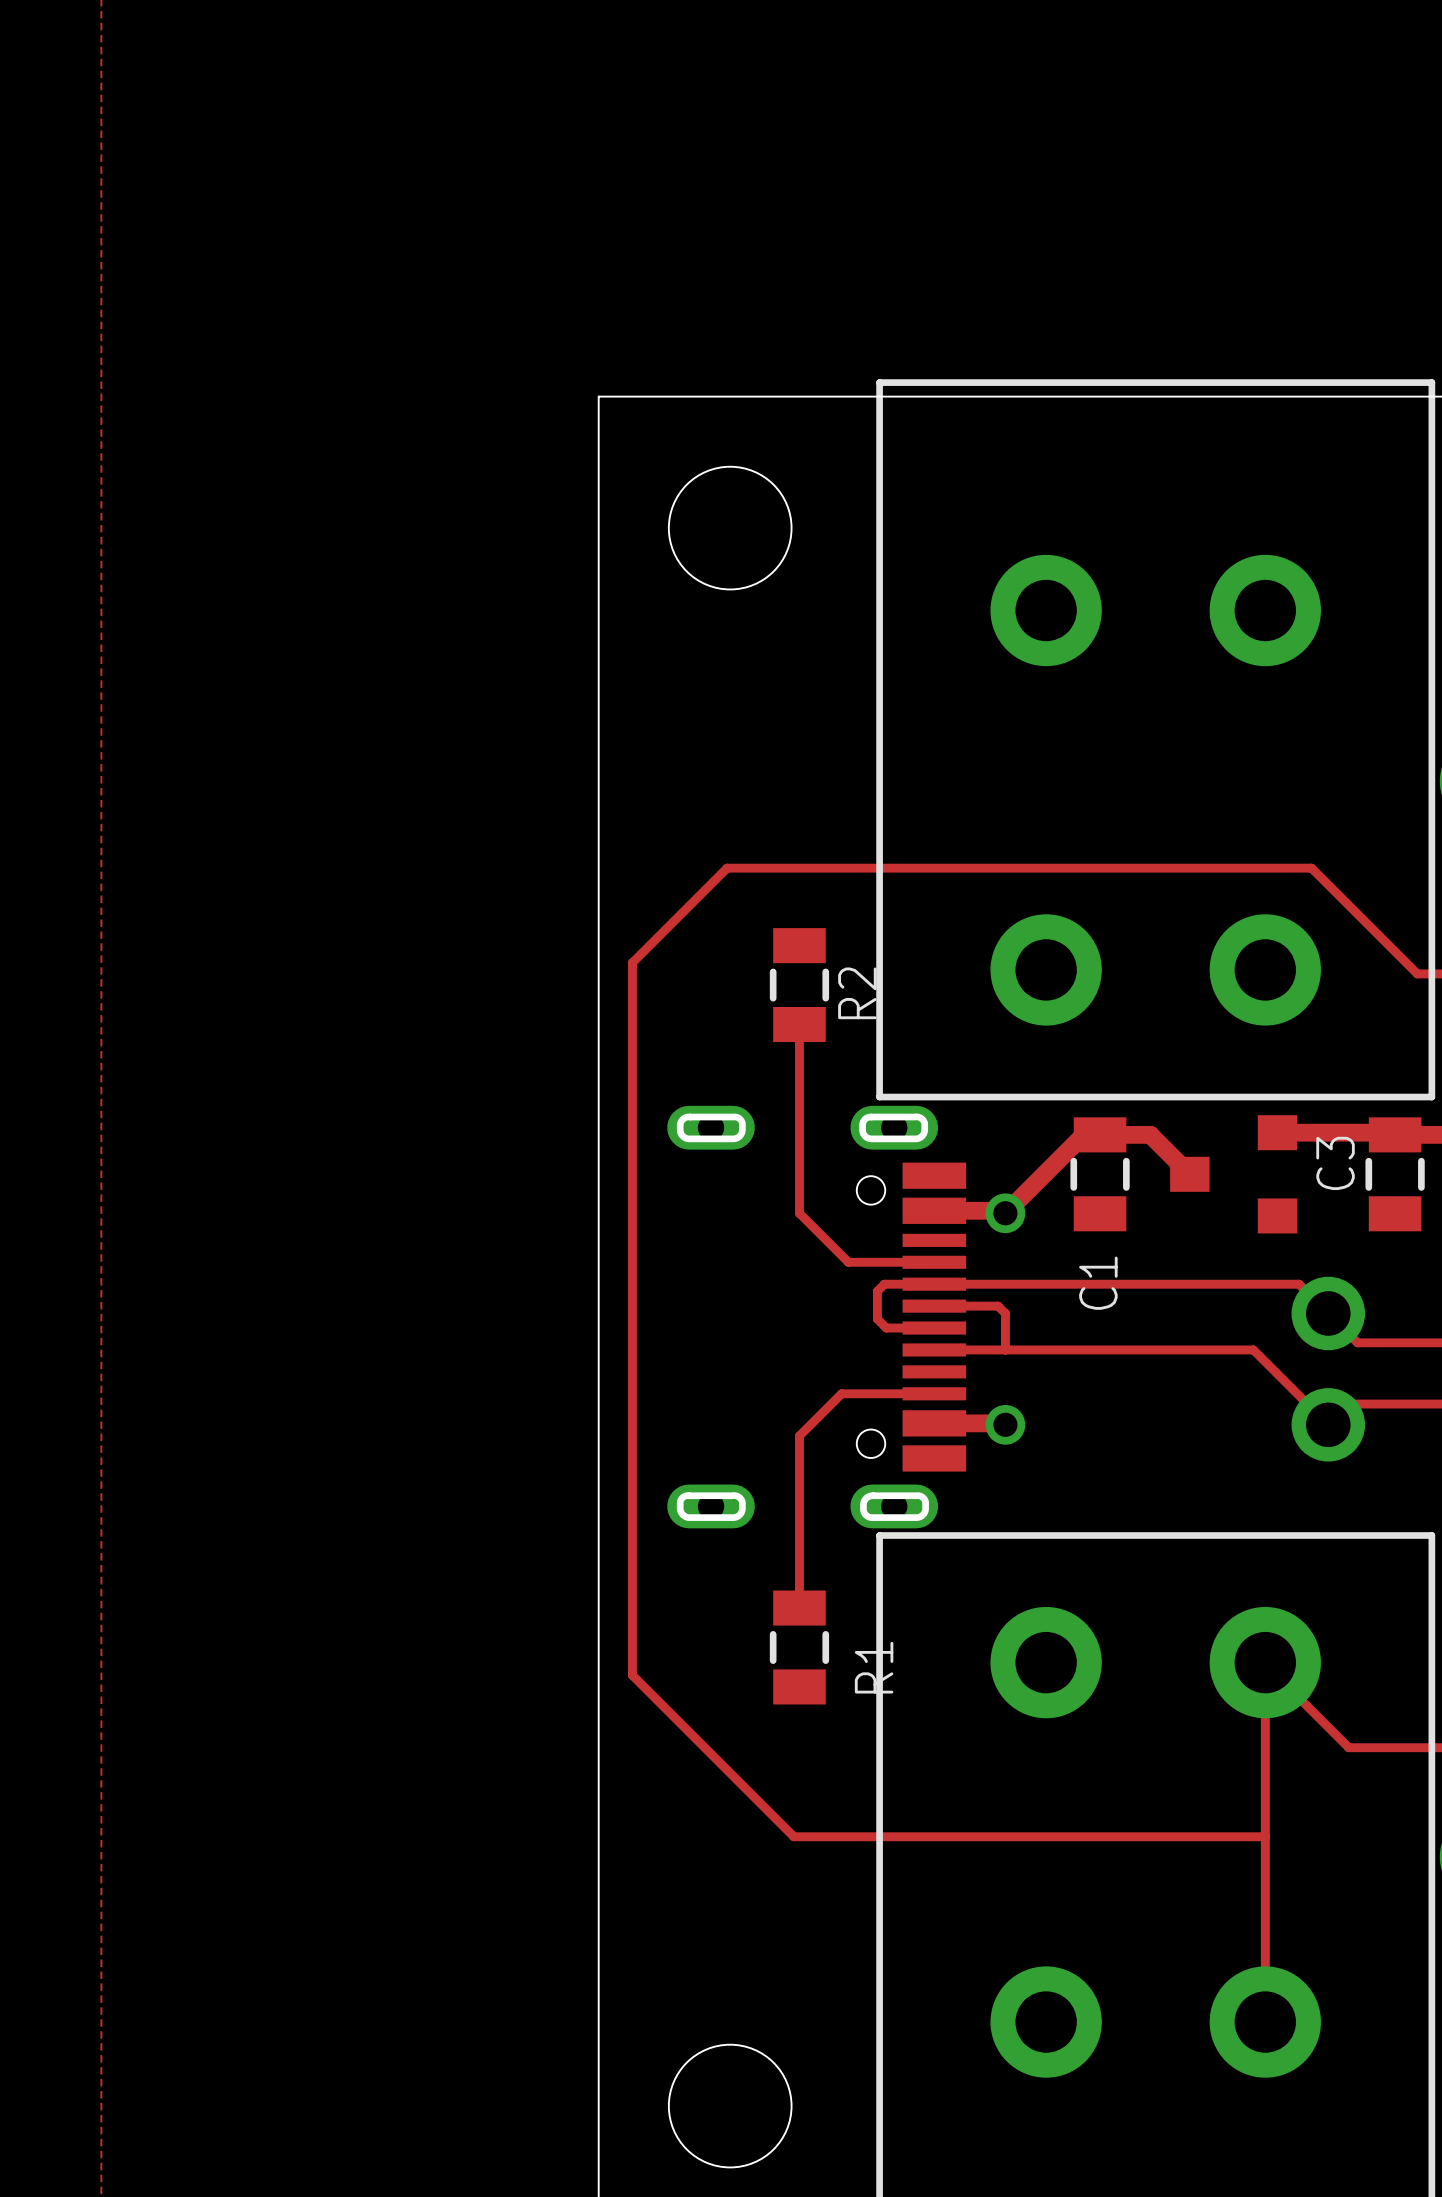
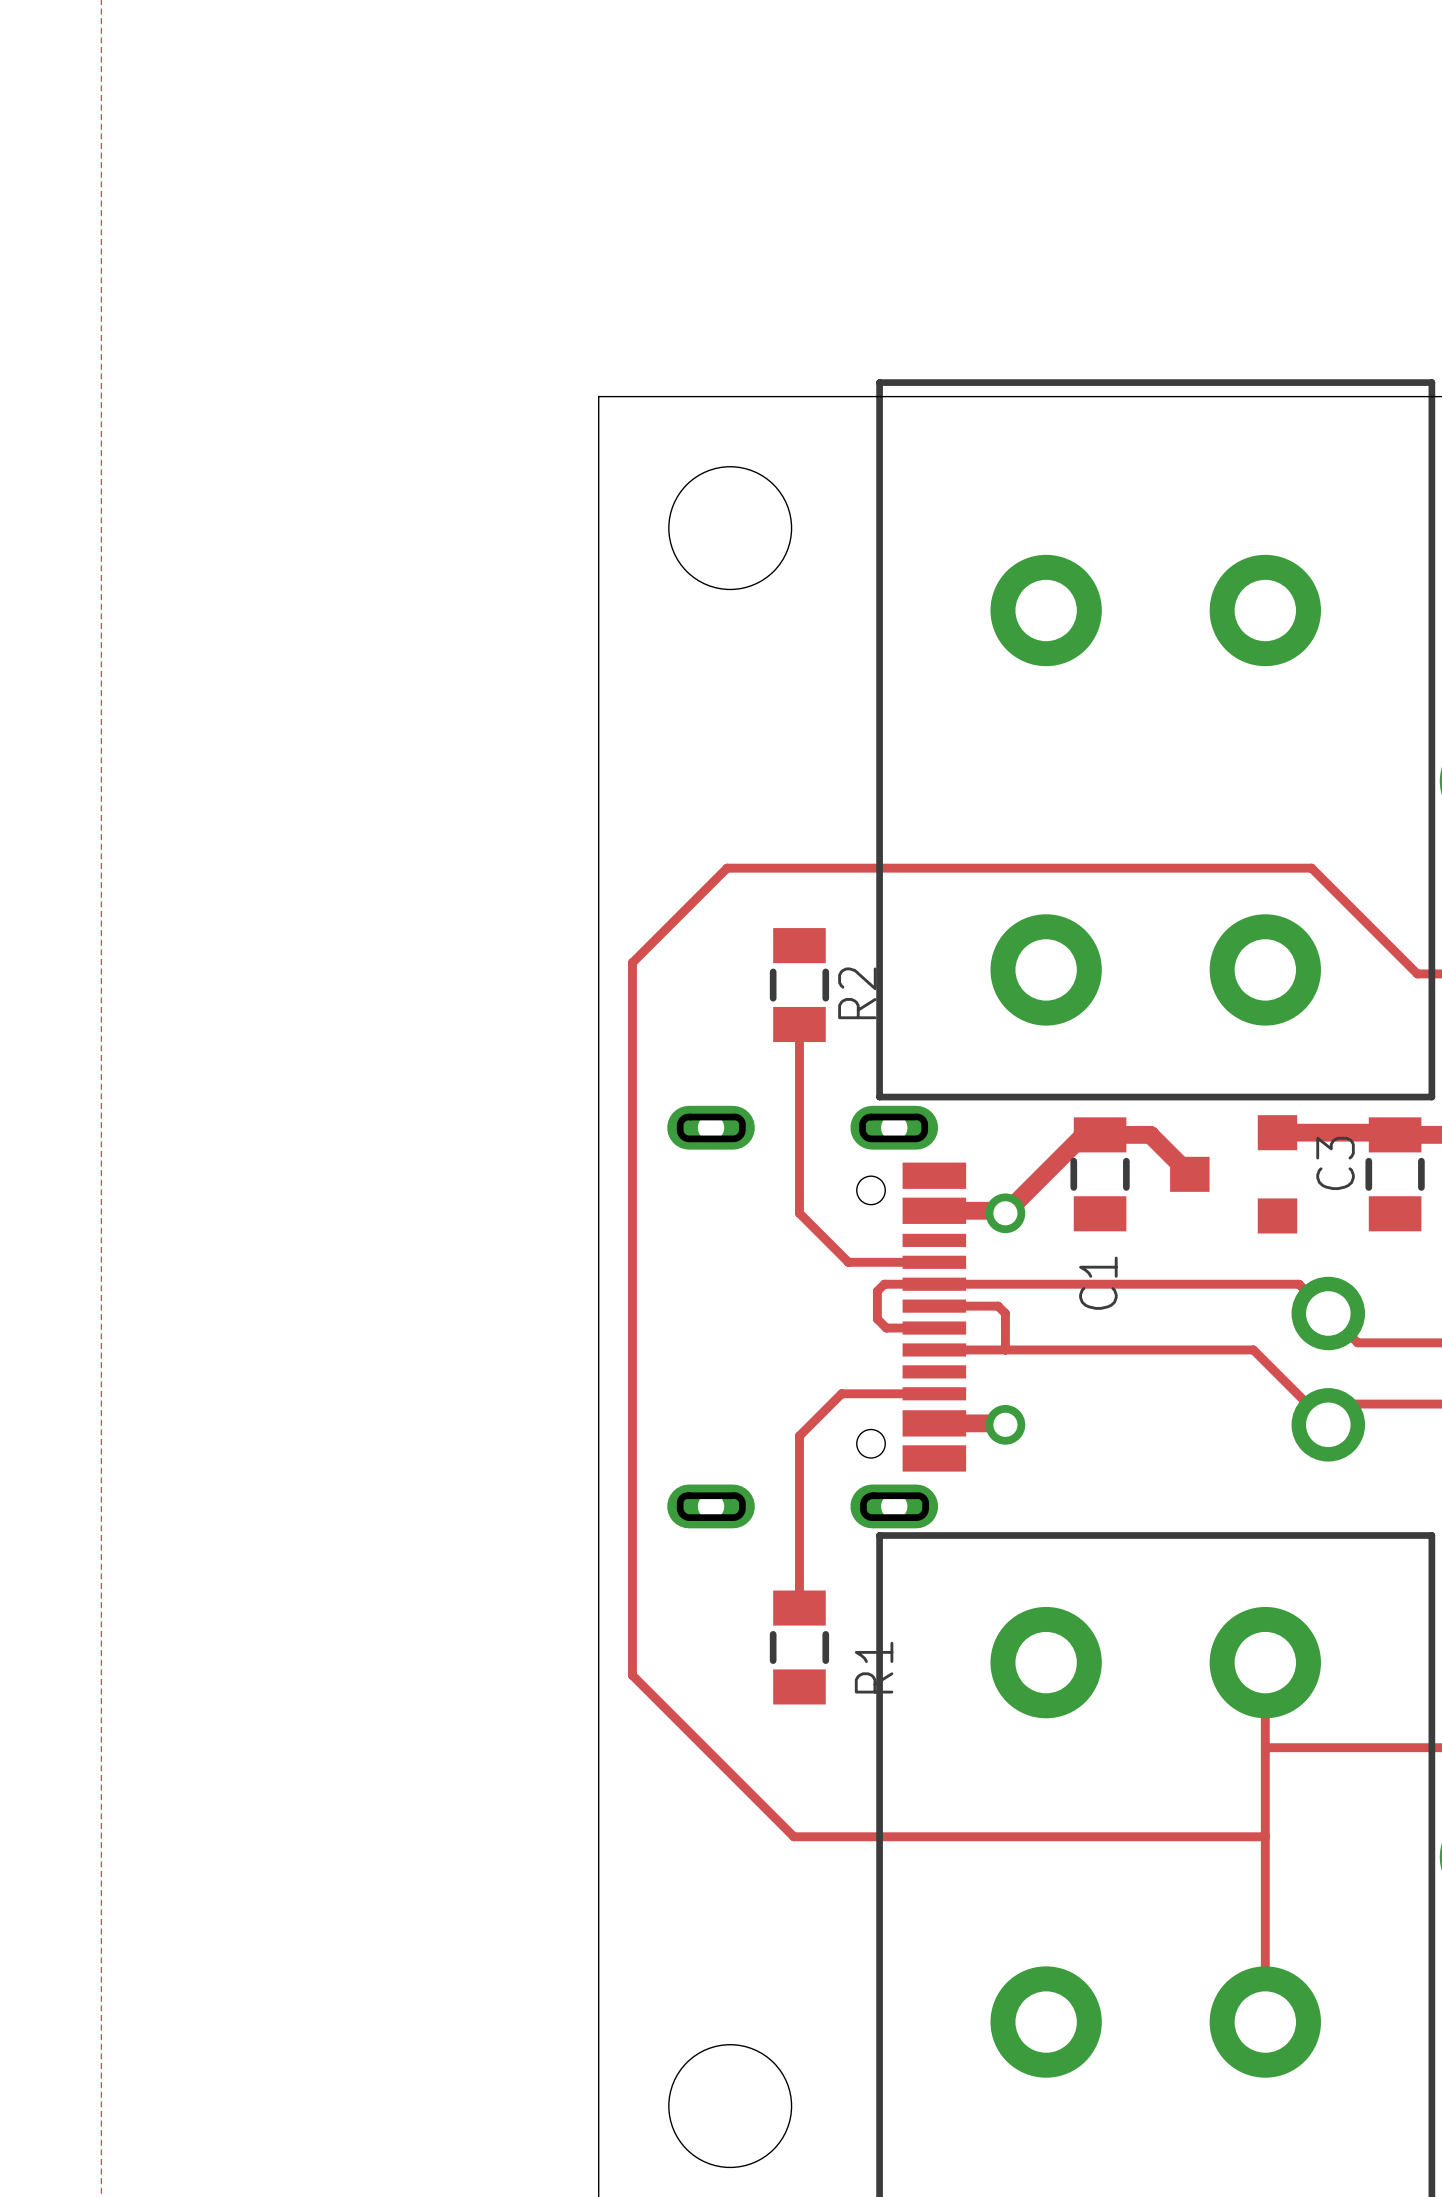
track: (1265, 1664) (1348, 1747) -> (1265, 1747) (1348, 1747)

